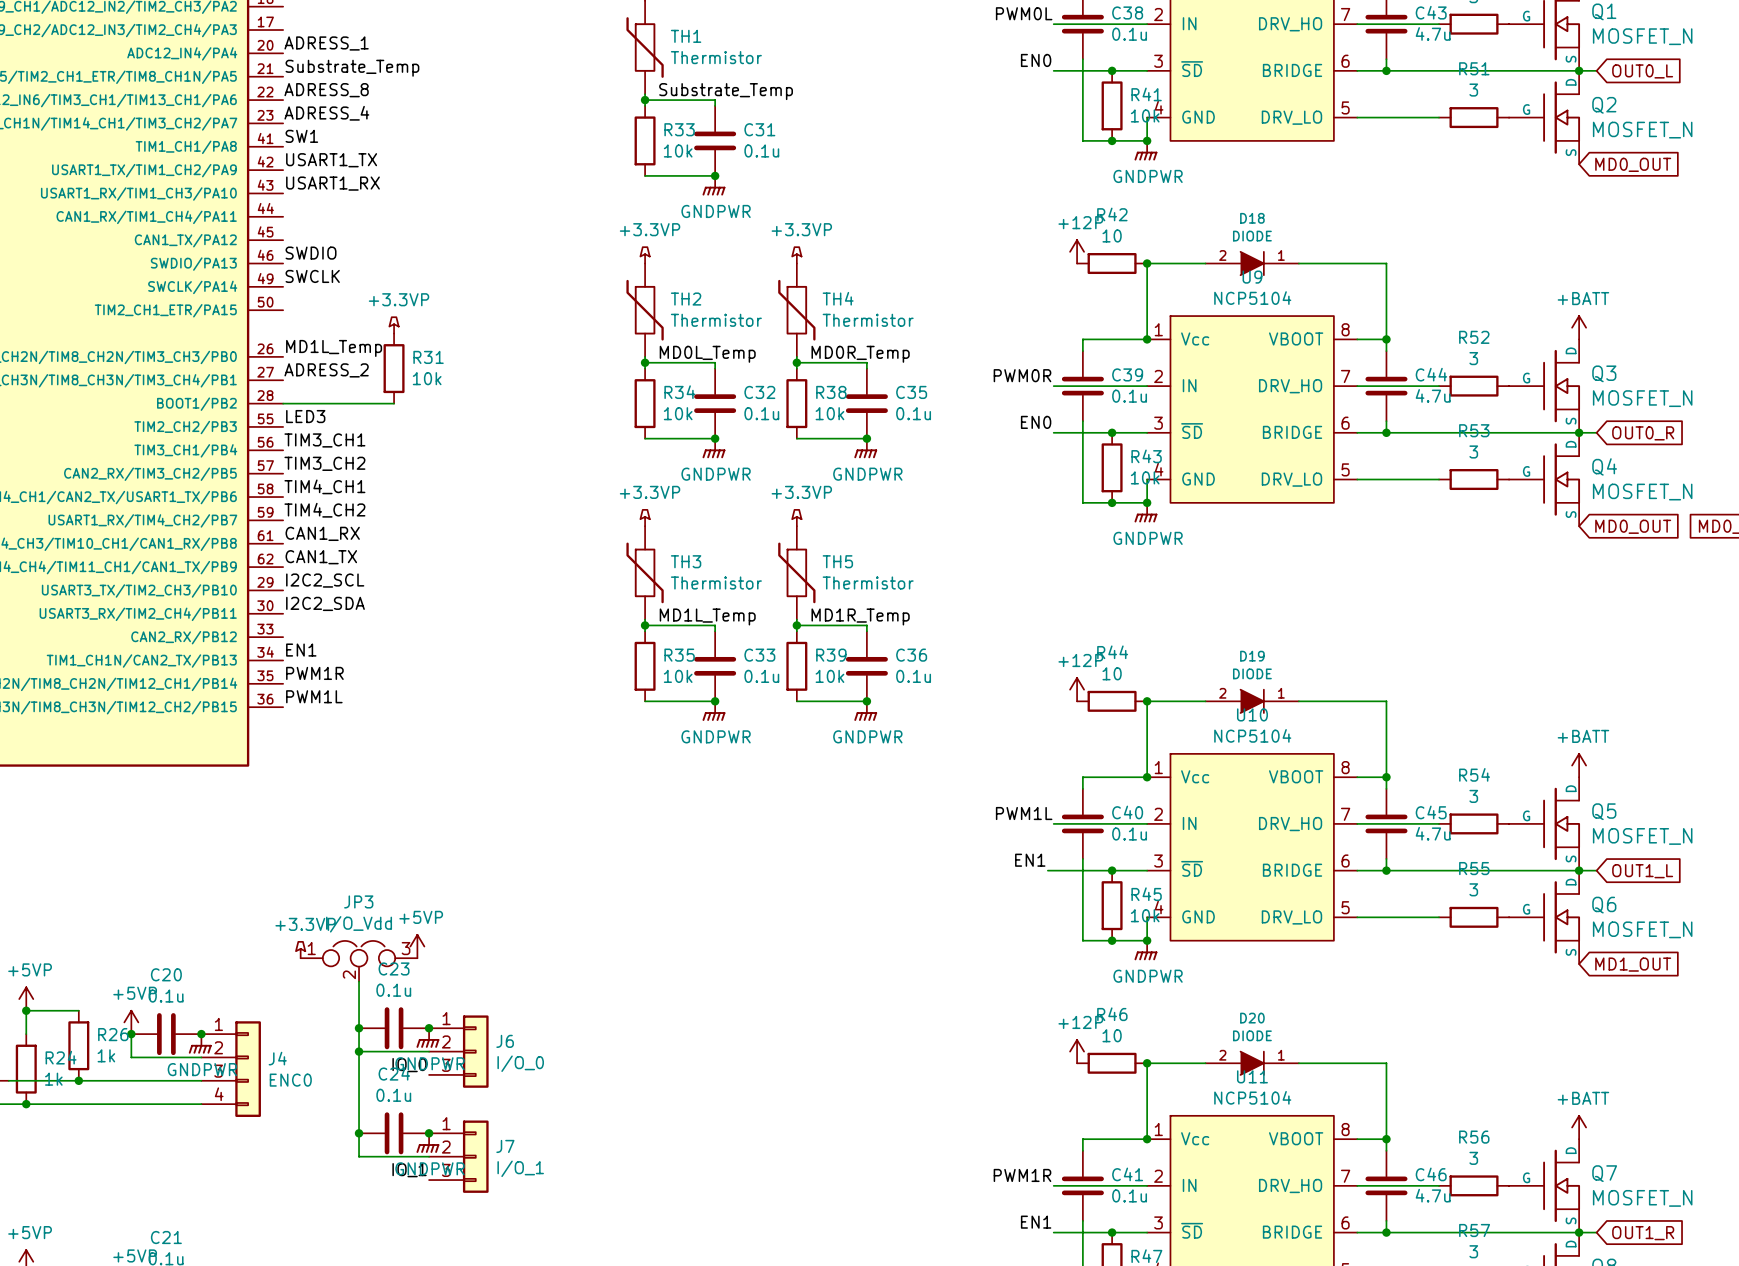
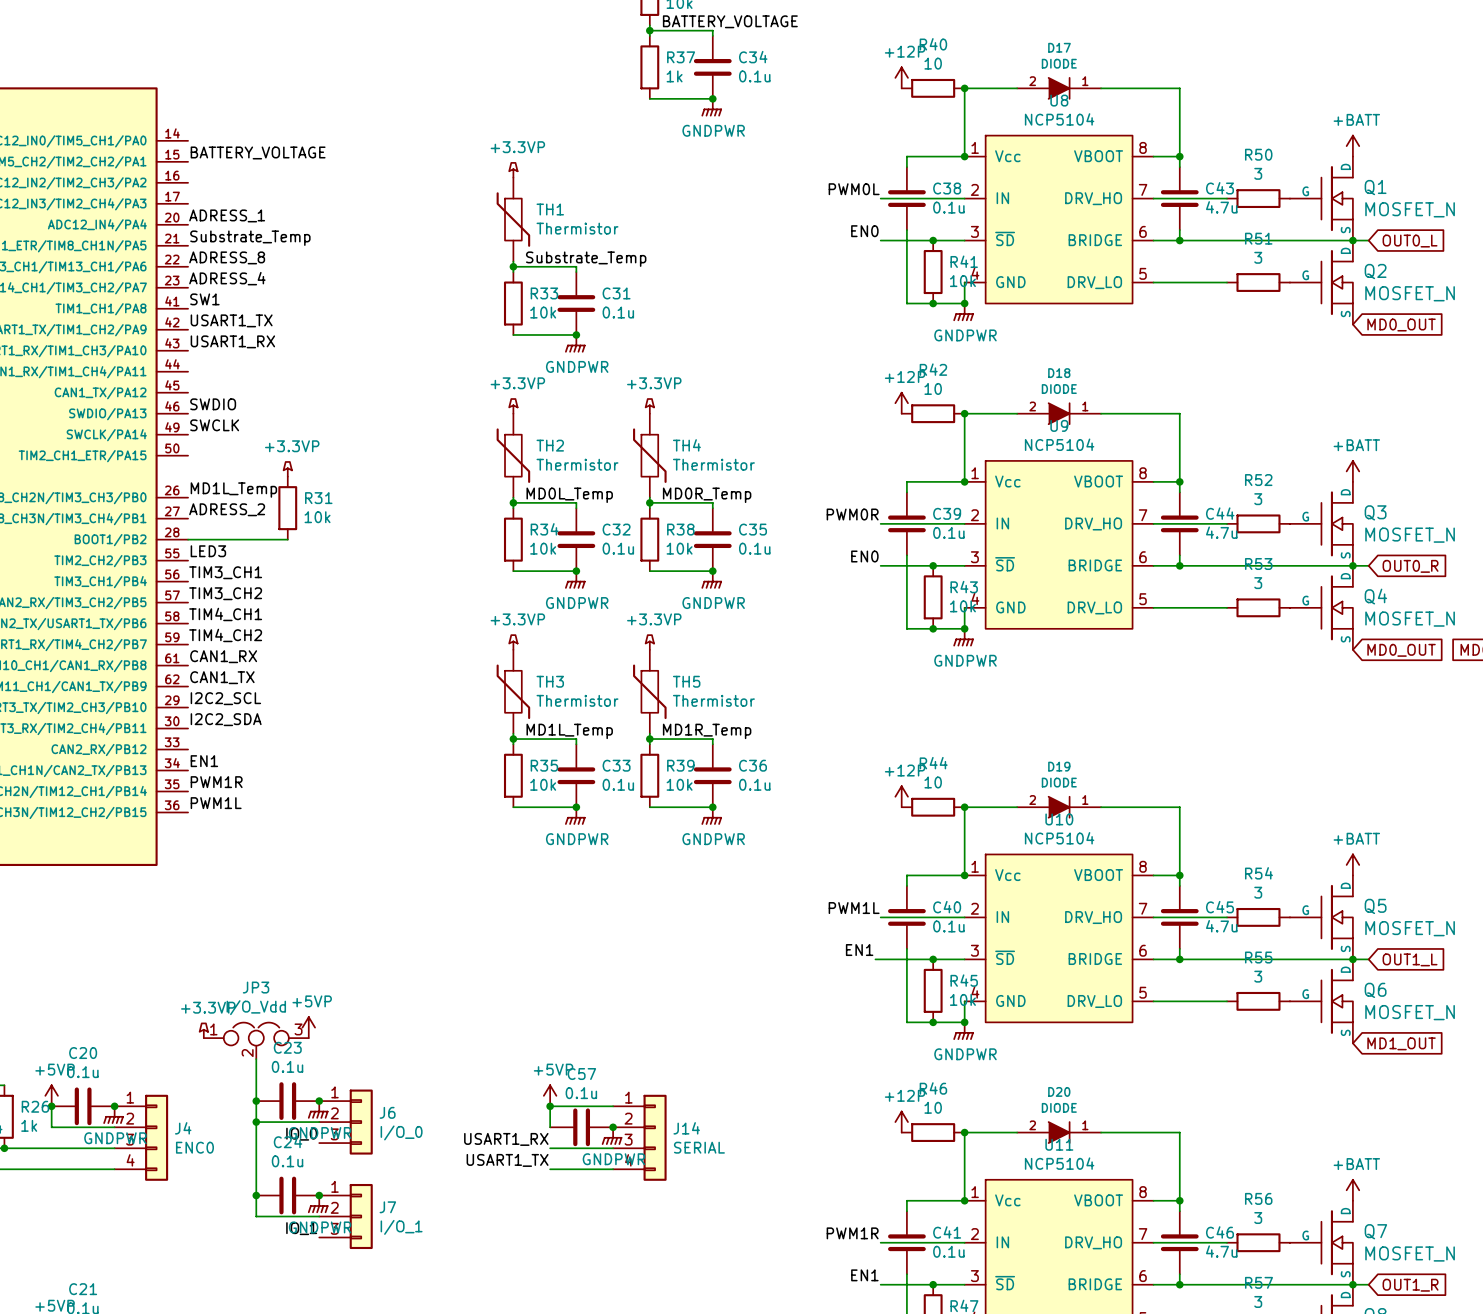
power symbol: none -> +5VP (550, 1095)
junction: none -> (550, 1106)
wire: none -> (613, 1106) (550, 1106) (550, 1127)
C57: none -> 0.1u (581, 1127)
junction: none -> (613, 1127)
power symbol: none -> GNDPWR (612, 1136)
J14: none -> SERIAL (639, 1137)
label: none -> USART1_RX (506, 1139)
wire: none -> (550, 1148) (613, 1148)
label: none -> USART1_TX (507, 1160)
wire: none -> (550, 1169) (613, 1169)

